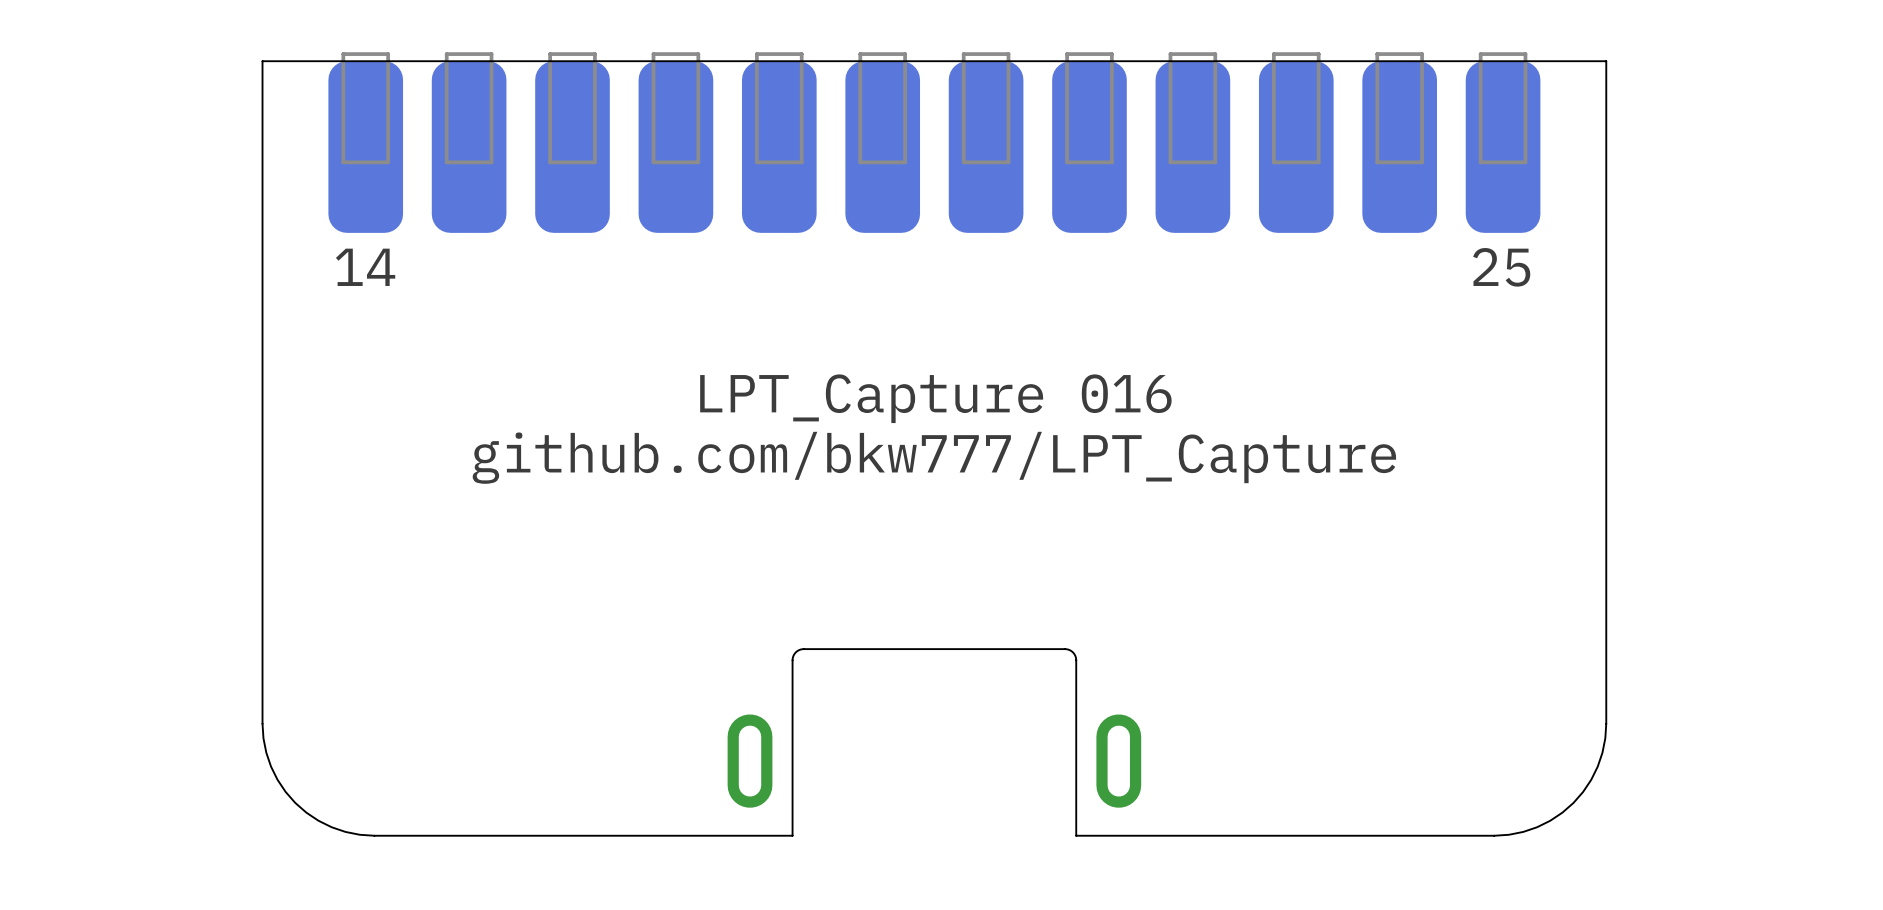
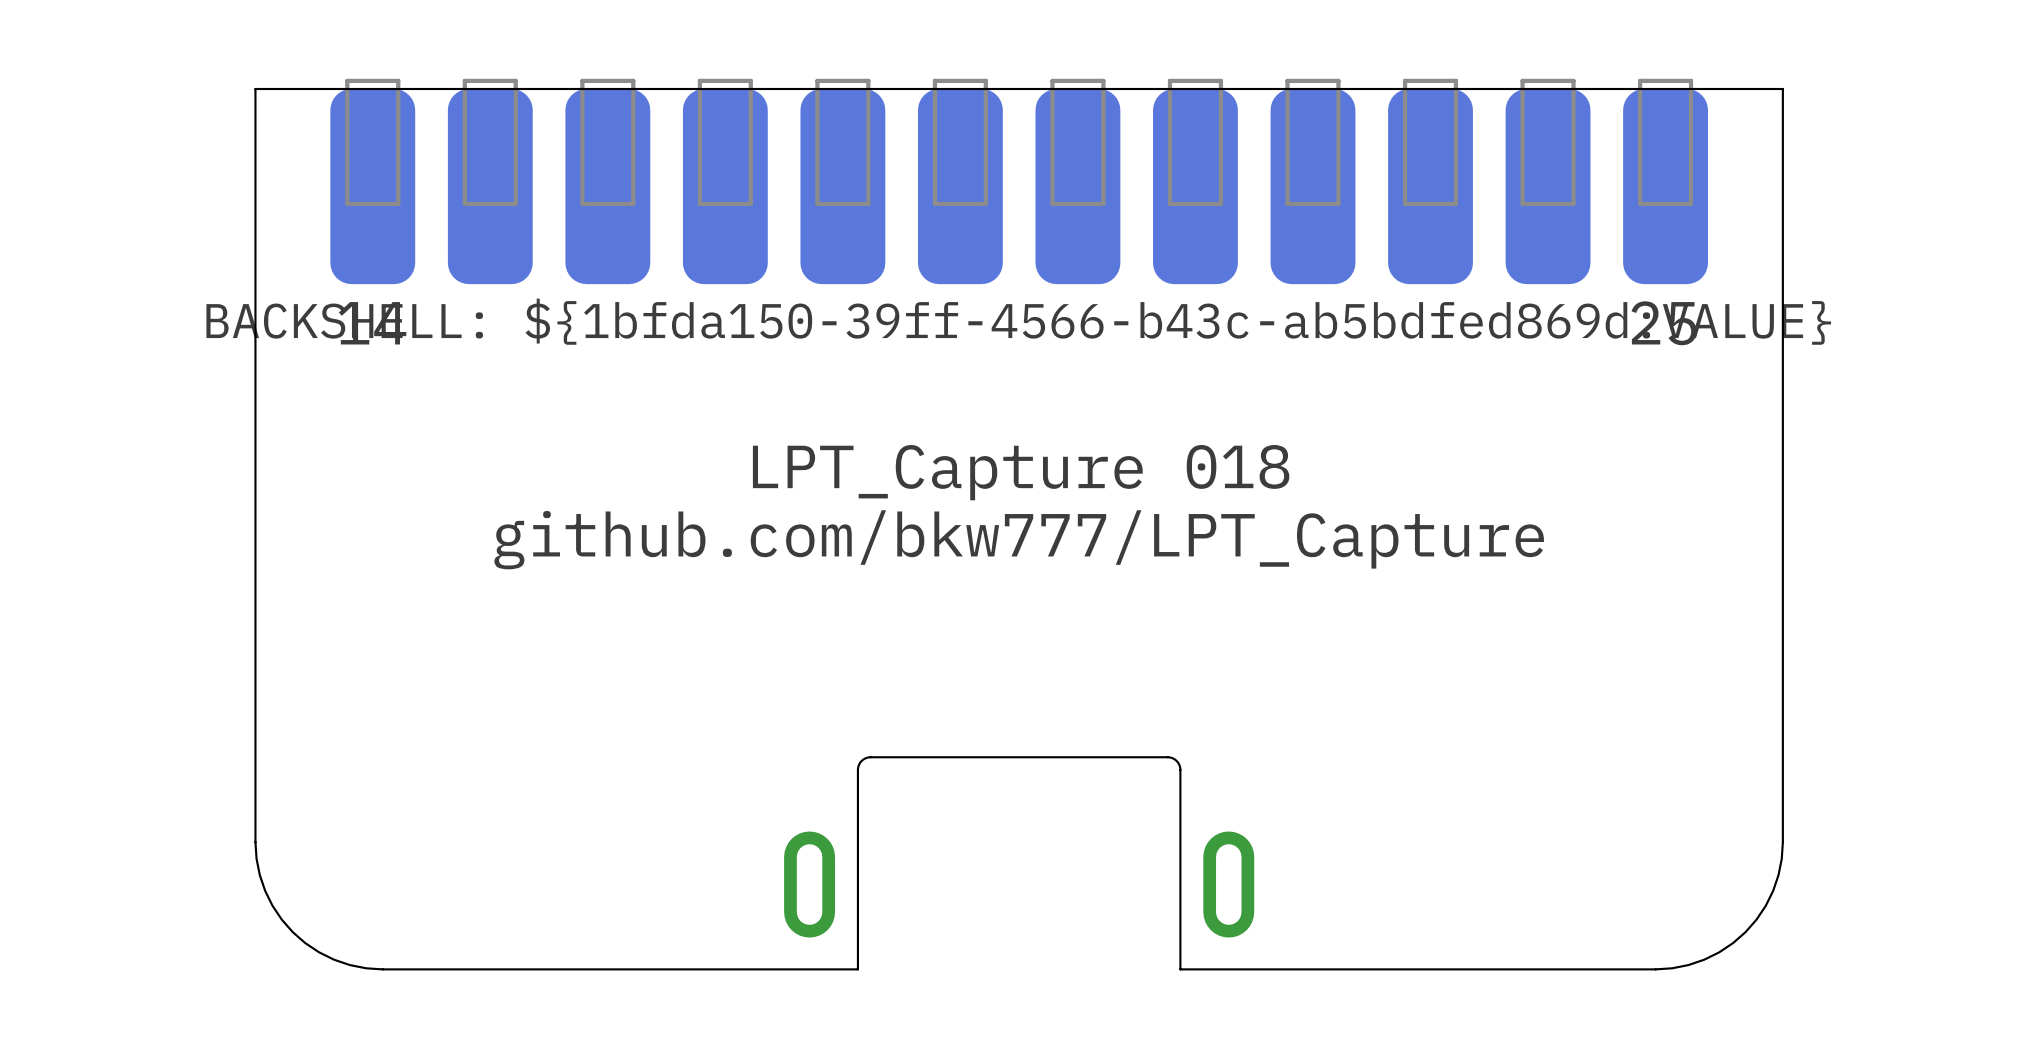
text: none -> BACKSHELL: ${1bfda150-39ff-4566-b43c-ab5bdfed869d:VALUE} (1018, 321)
text: LPT_Capture 016 (935, 398) -> LPT_Capture 018 (1021, 472)

